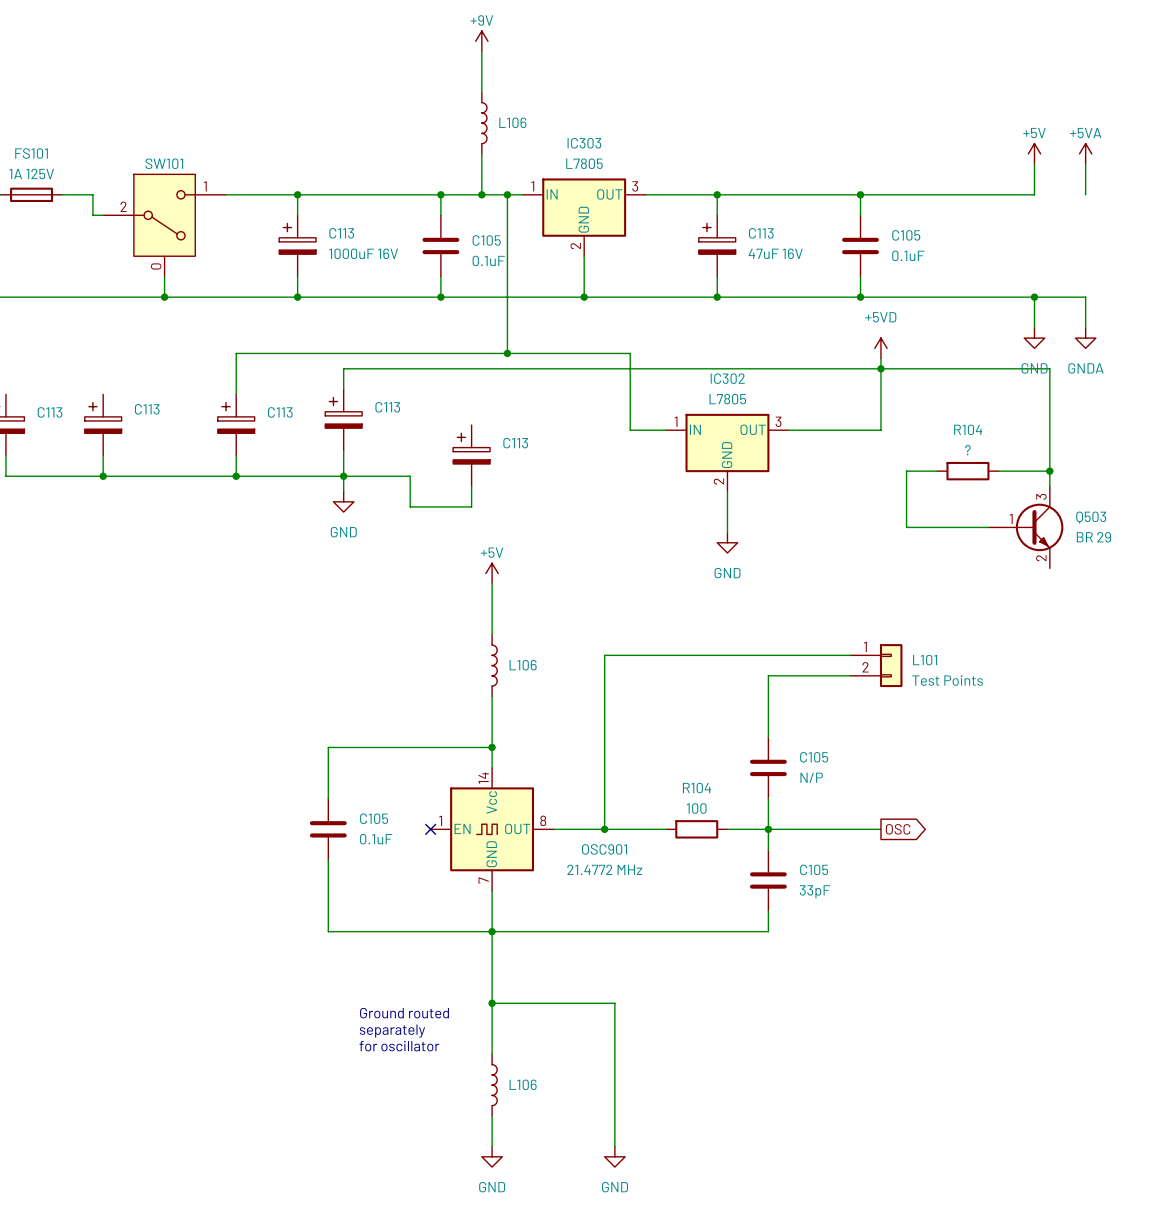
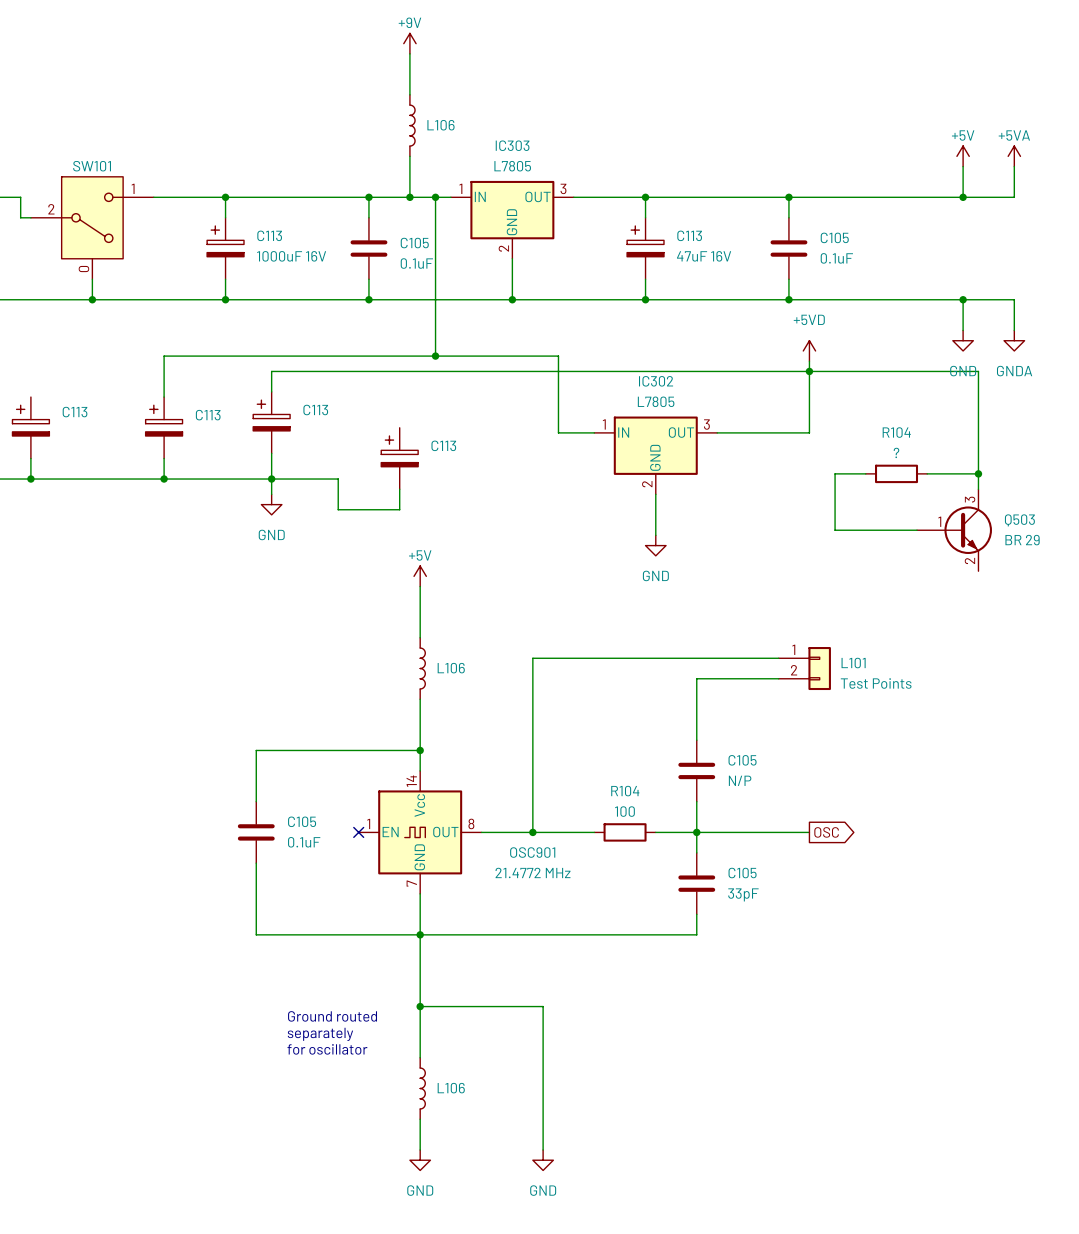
wire: none -> (963, 197) (1014, 197)
junction: none -> (963, 197)

